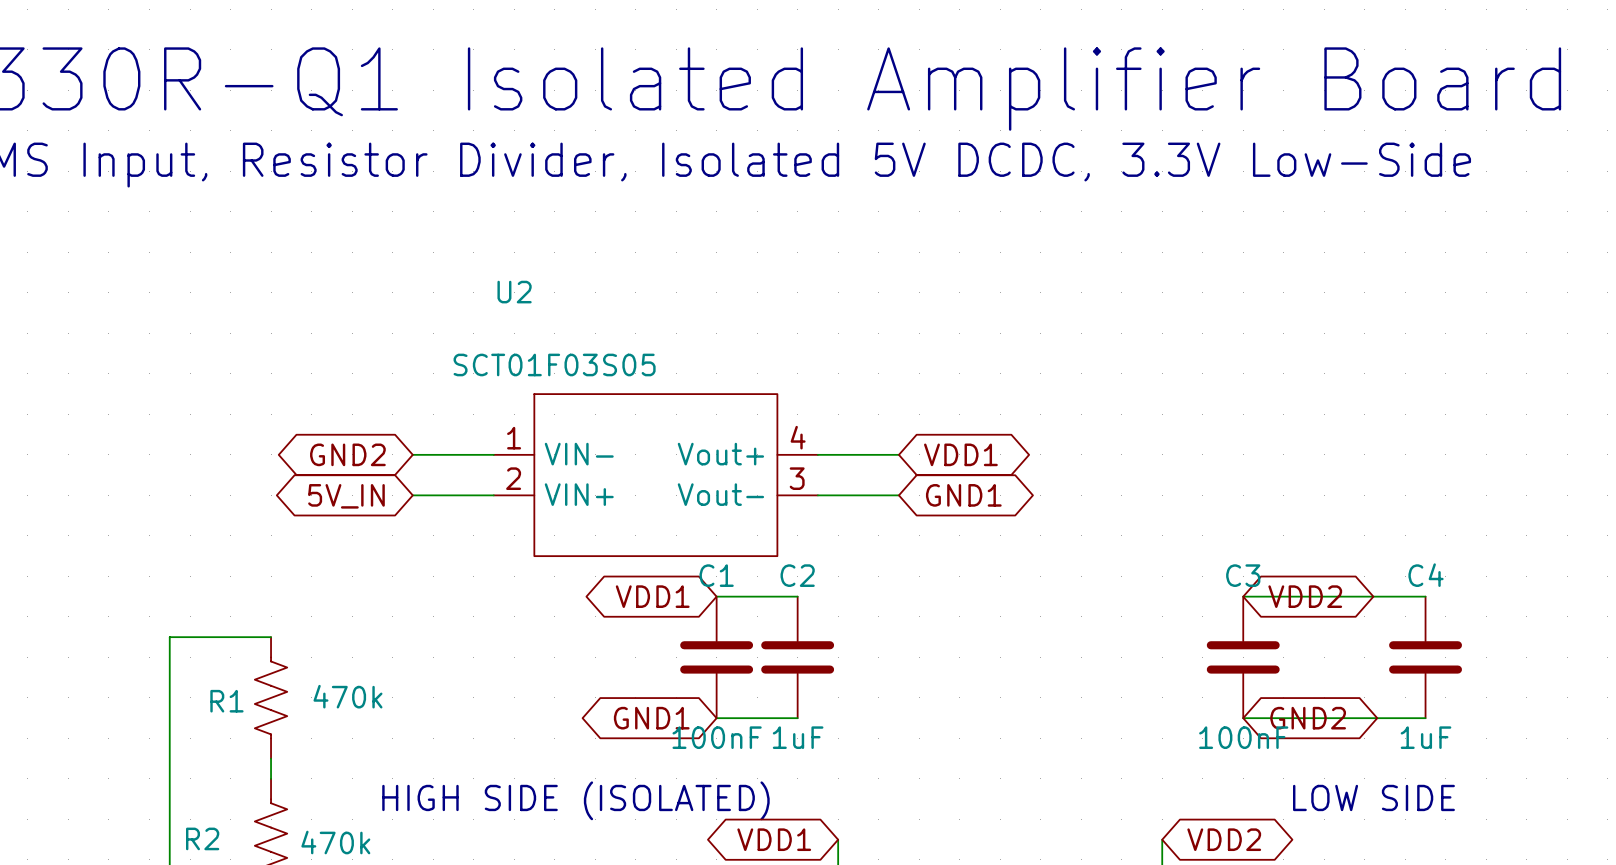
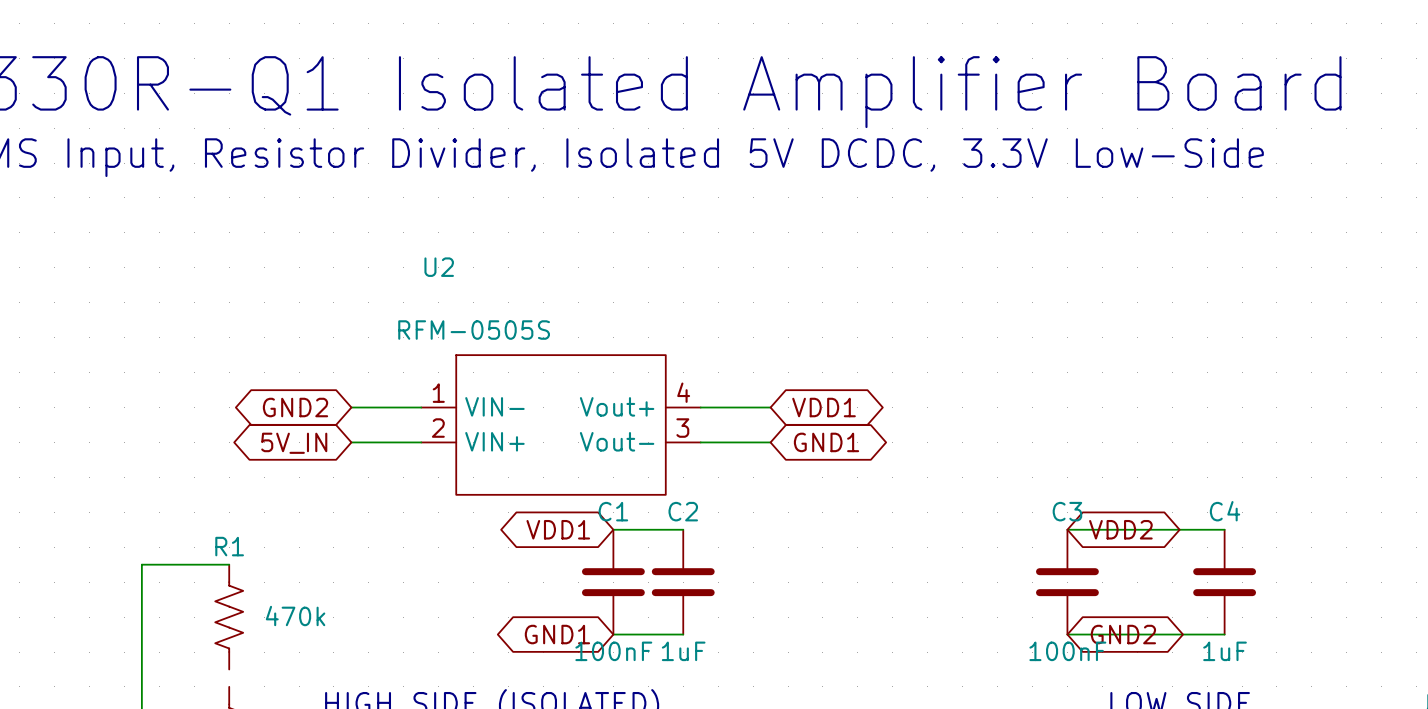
U2 value: SCT01F03S05 (554, 364) -> RFM-0505S (474, 330)
R1 name position: R1 (226, 701) -> R1 (229, 546)
wire: (271, 758) (271, 778) -> none

